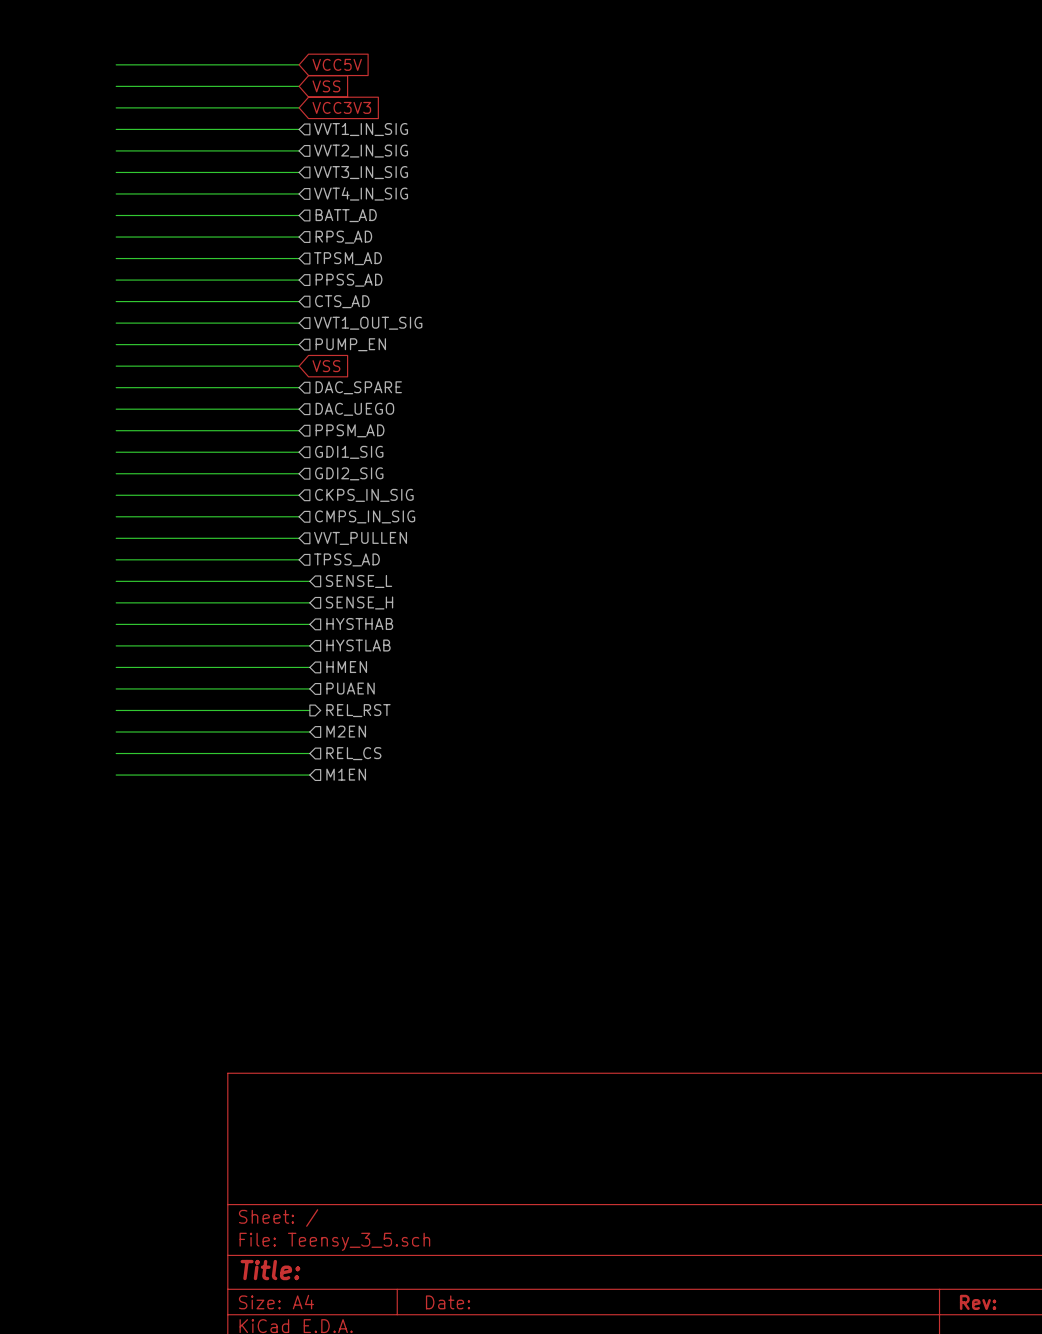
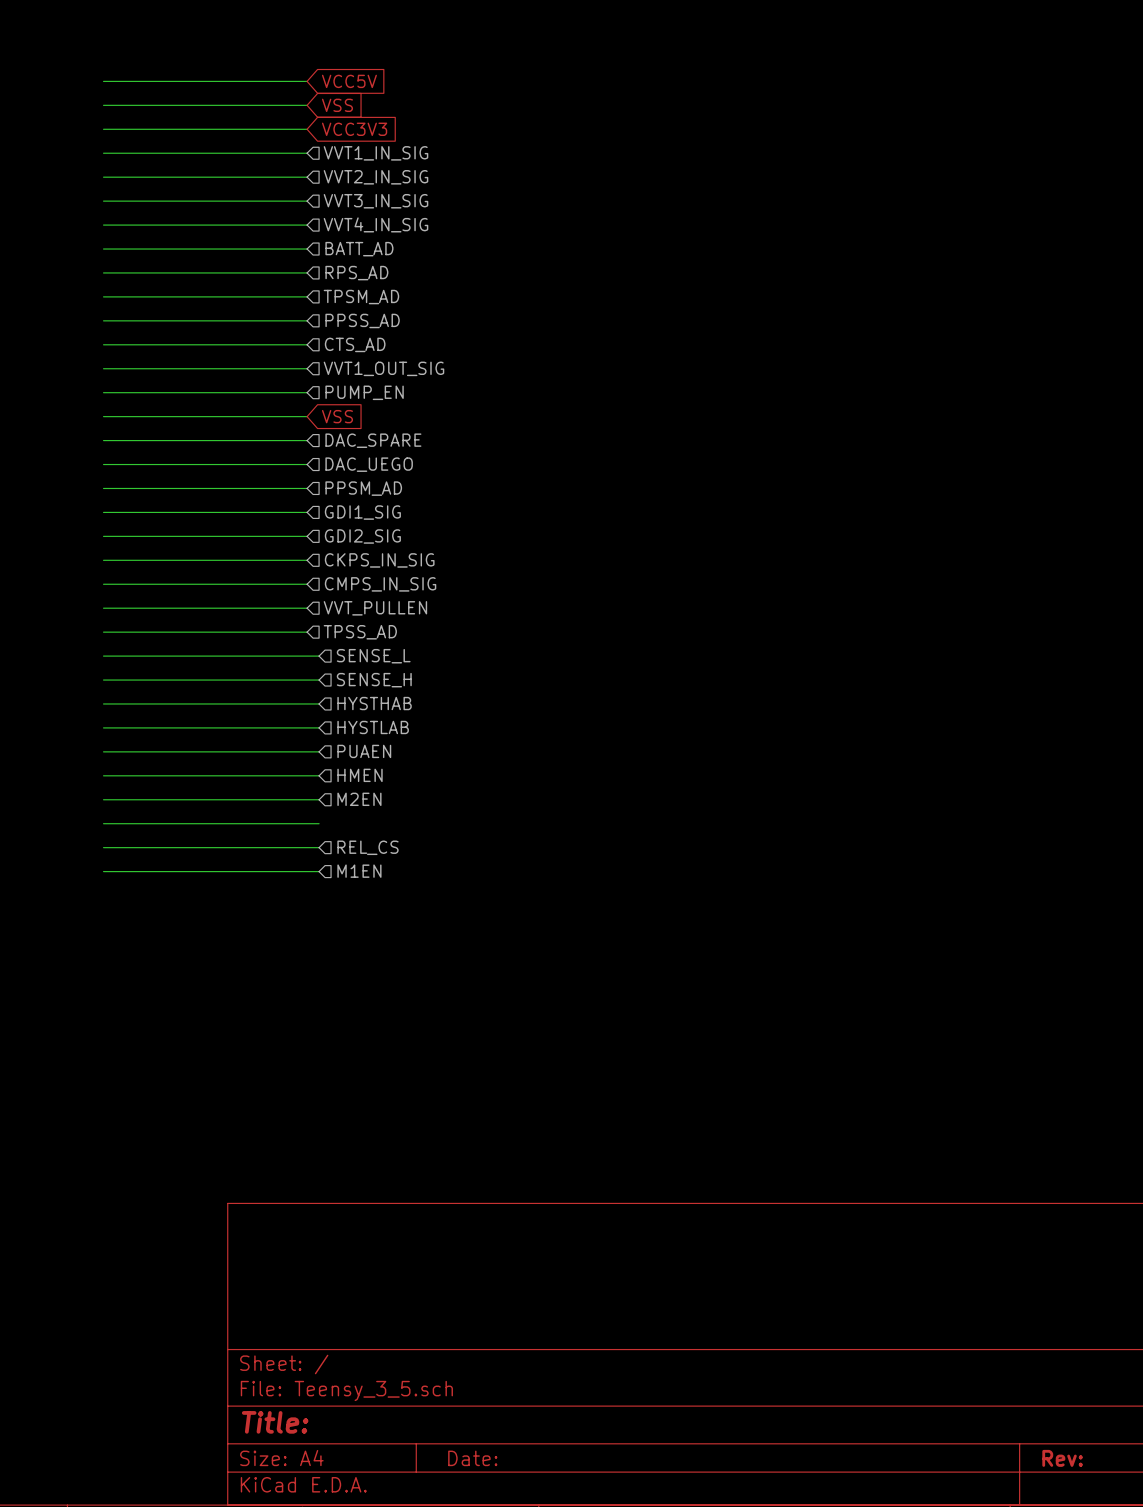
hierarchical label: HMEN (346, 667) -> PUAEN (364, 751)
hierarchical label: PUAEN (350, 688) -> HMEN (360, 775)
hierarchical label shape: output (358, 710) -> input (359, 799)
hierarchical label: REL_RST (358, 710) -> M2EN (359, 799)
hierarchical label: M2EN (346, 731) -> none

